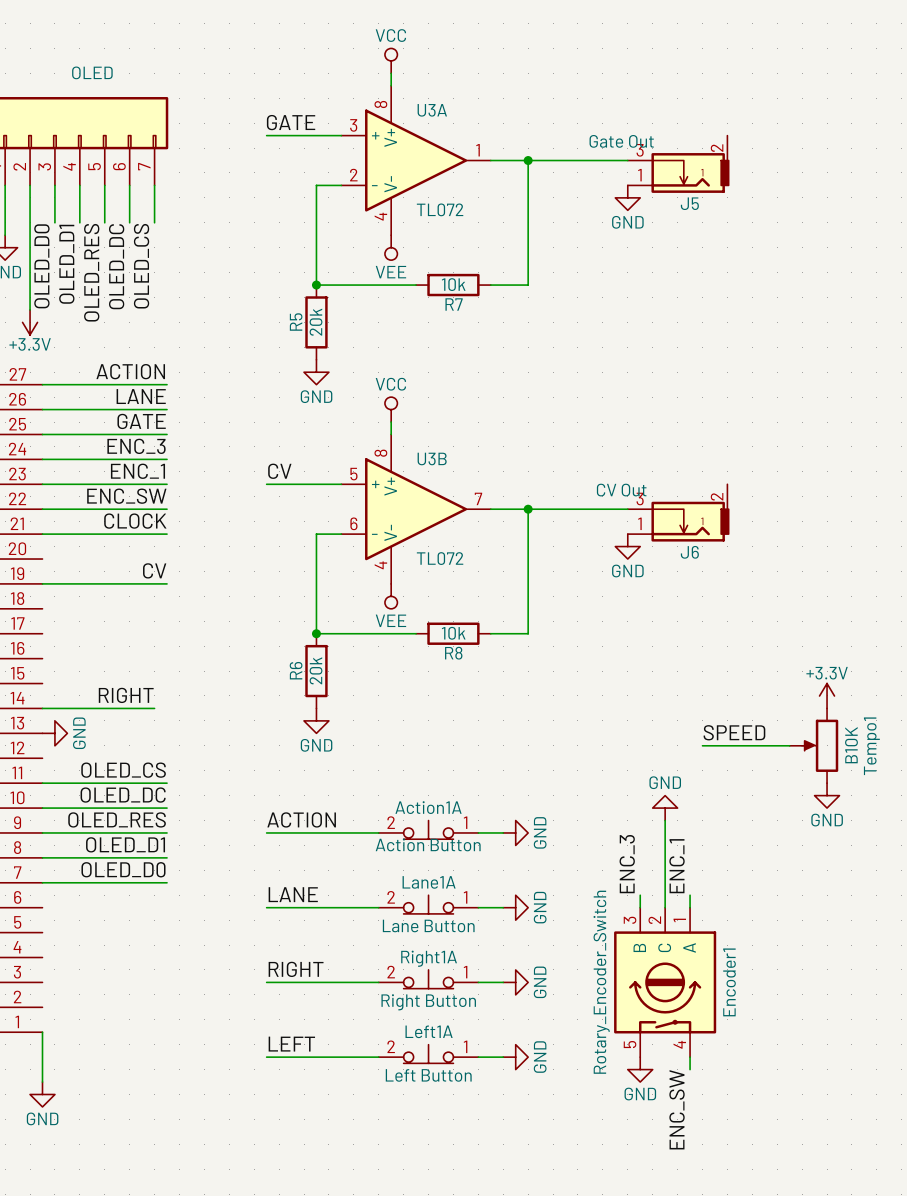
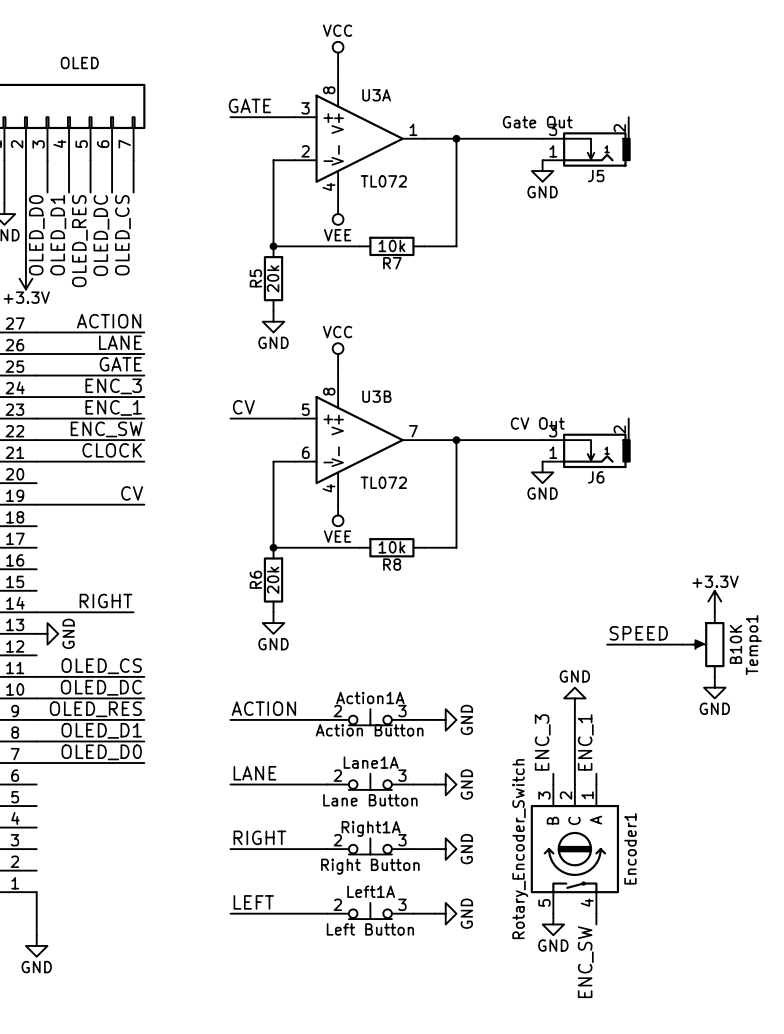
Action1A pin number: 1 (465, 822) -> 3 (402, 711)
Lane1A pin number: 1 (465, 897) -> 3 (402, 775)
Right1A pin number: 1 (465, 972) -> 3 (402, 840)
Left1A pin number: 1 (465, 1046) -> 3 (402, 904)

